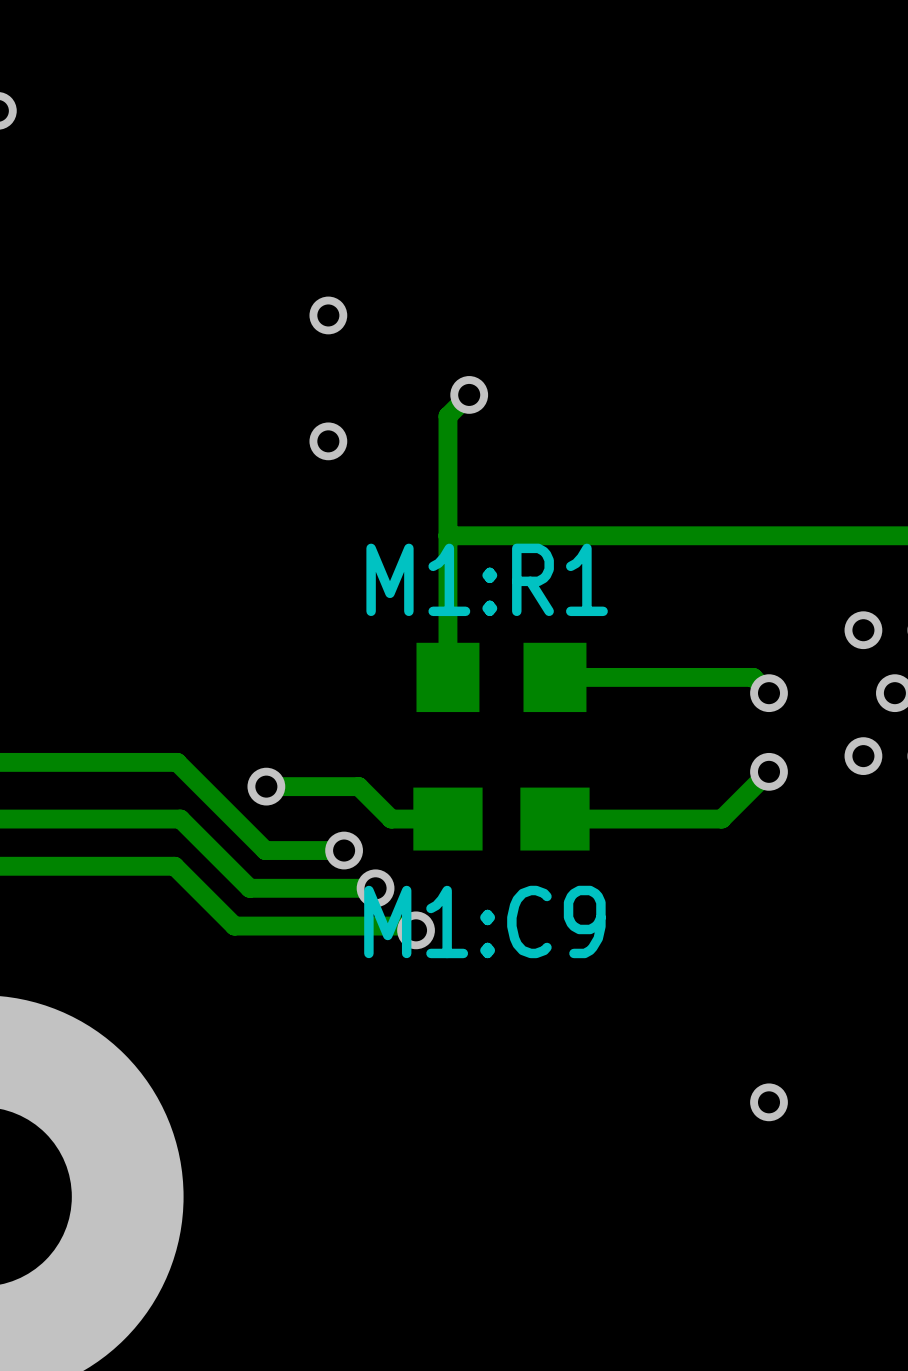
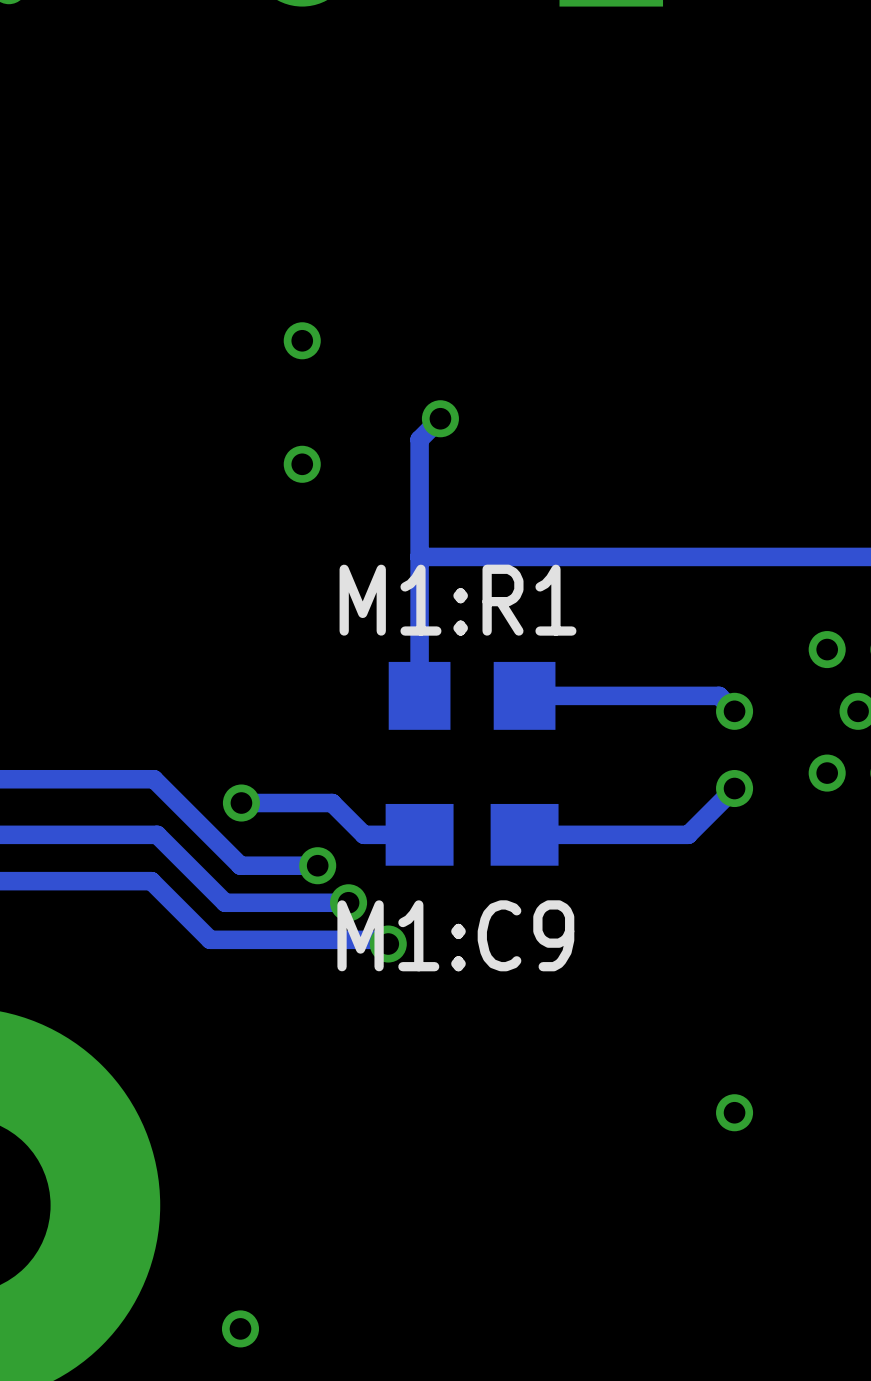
via: none -> (240, 1328)

